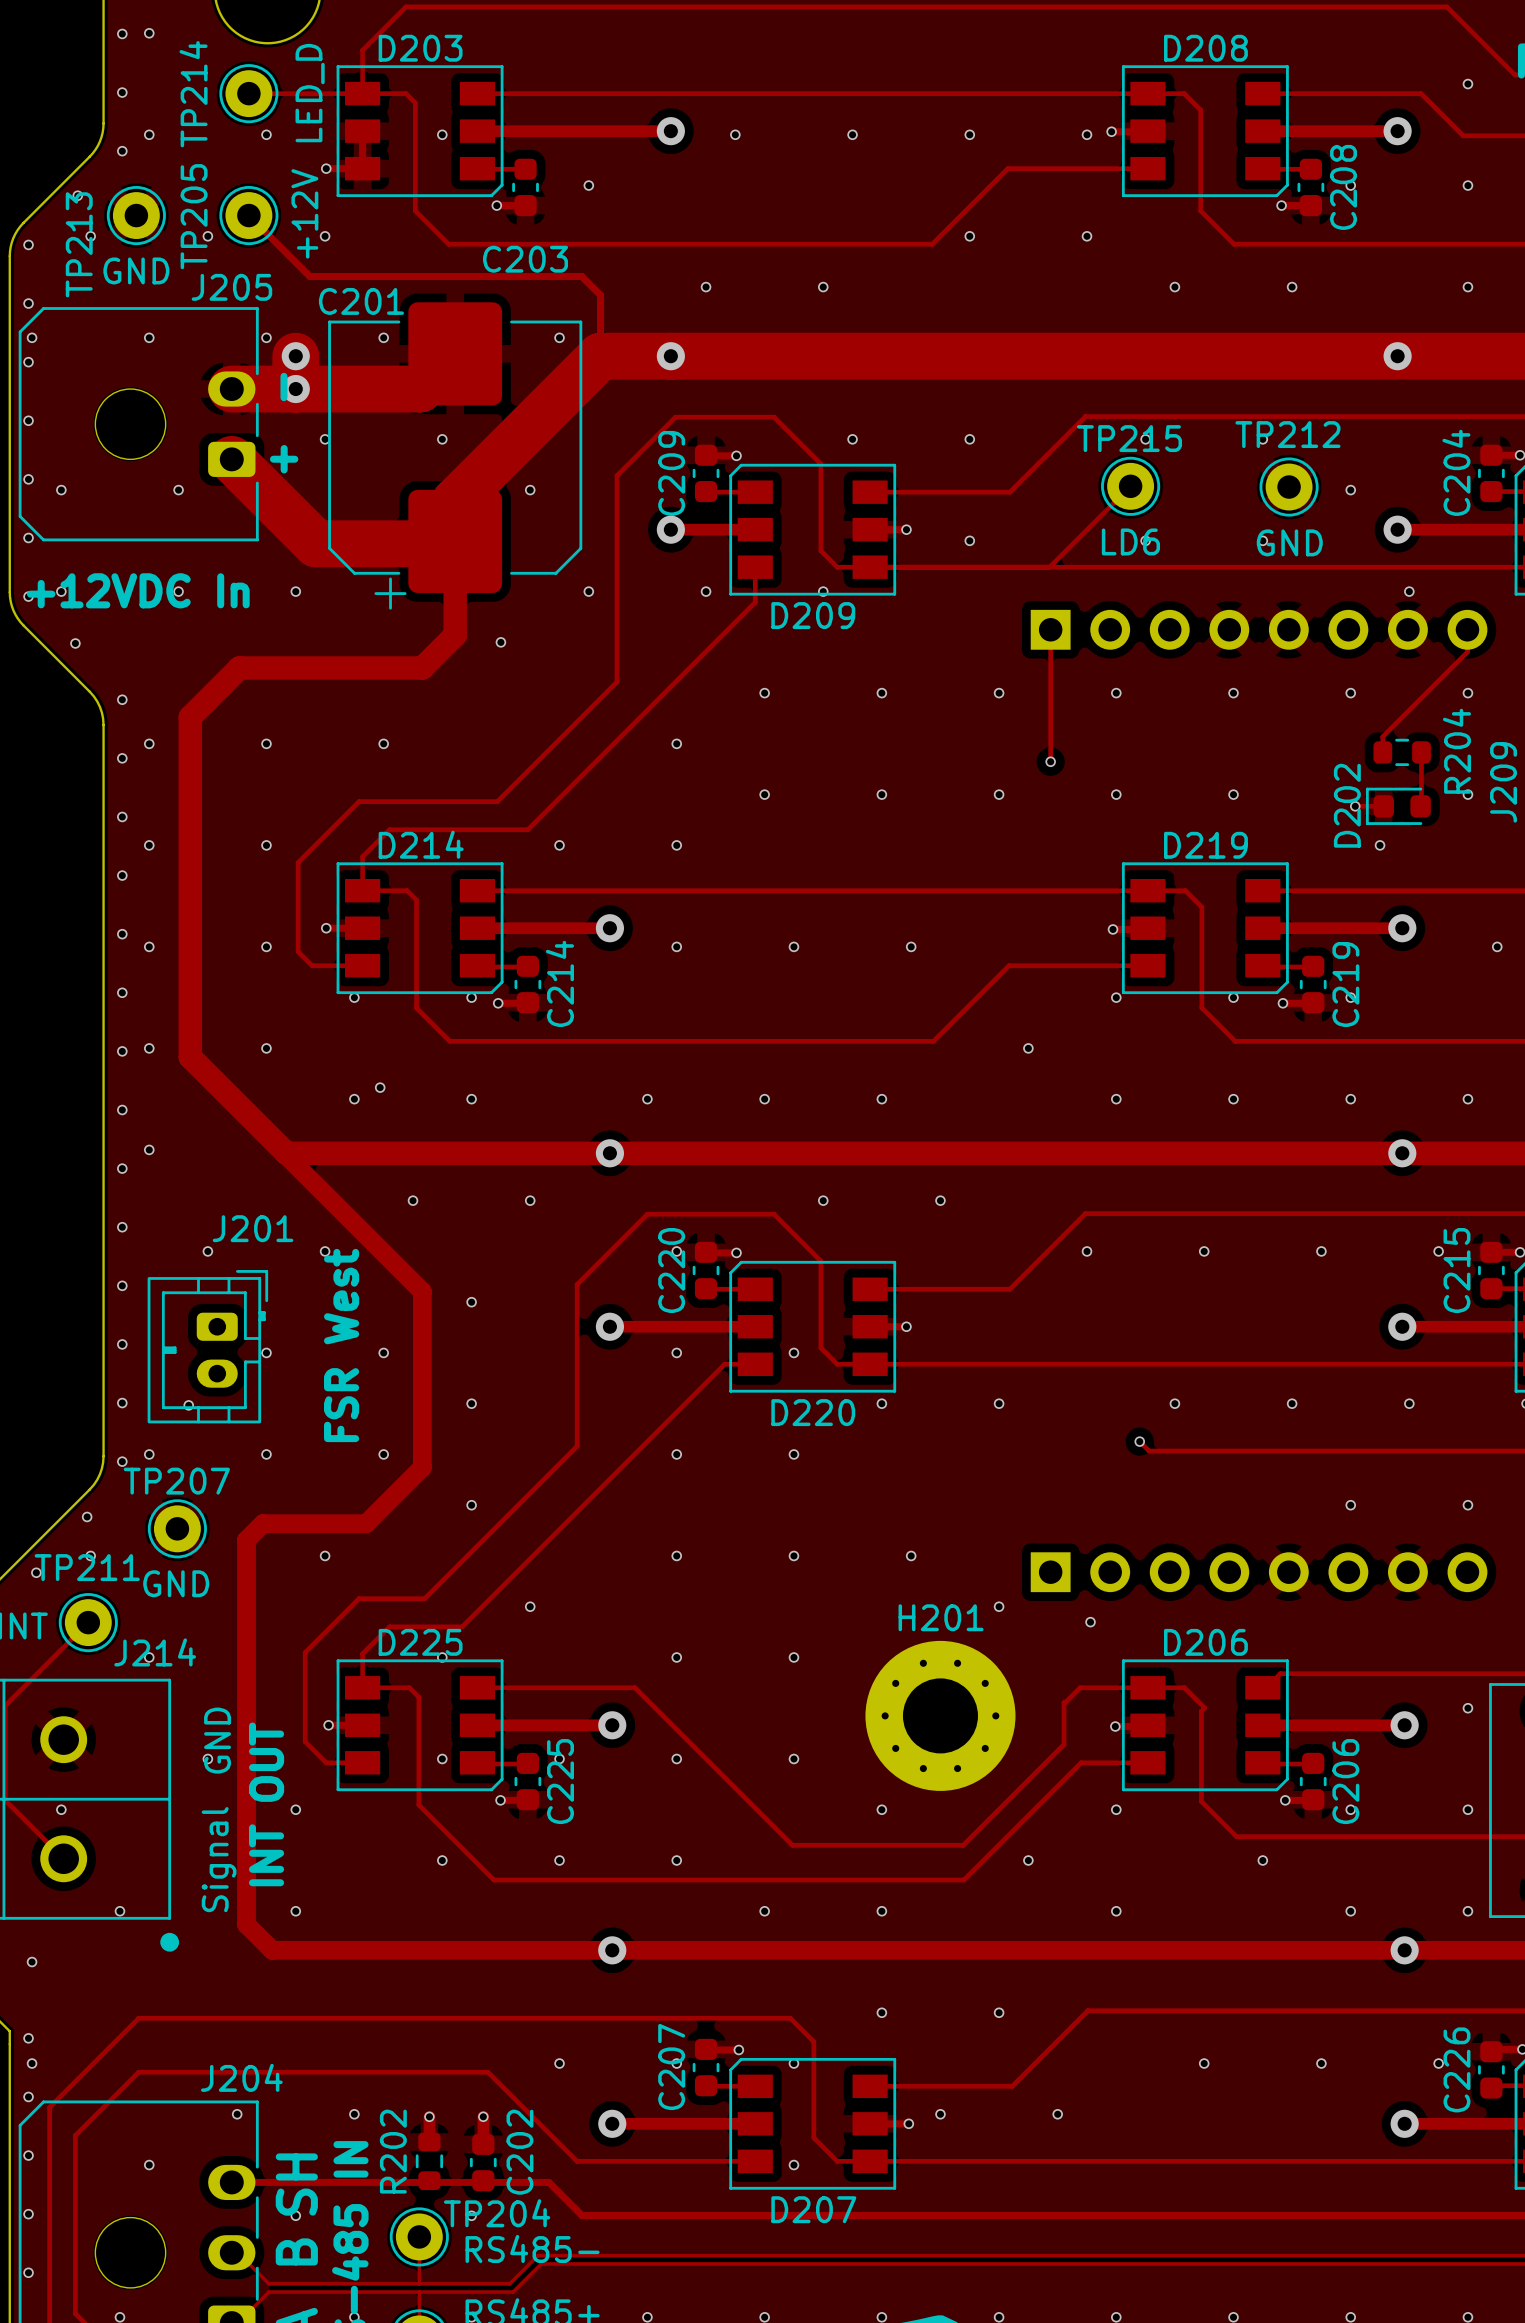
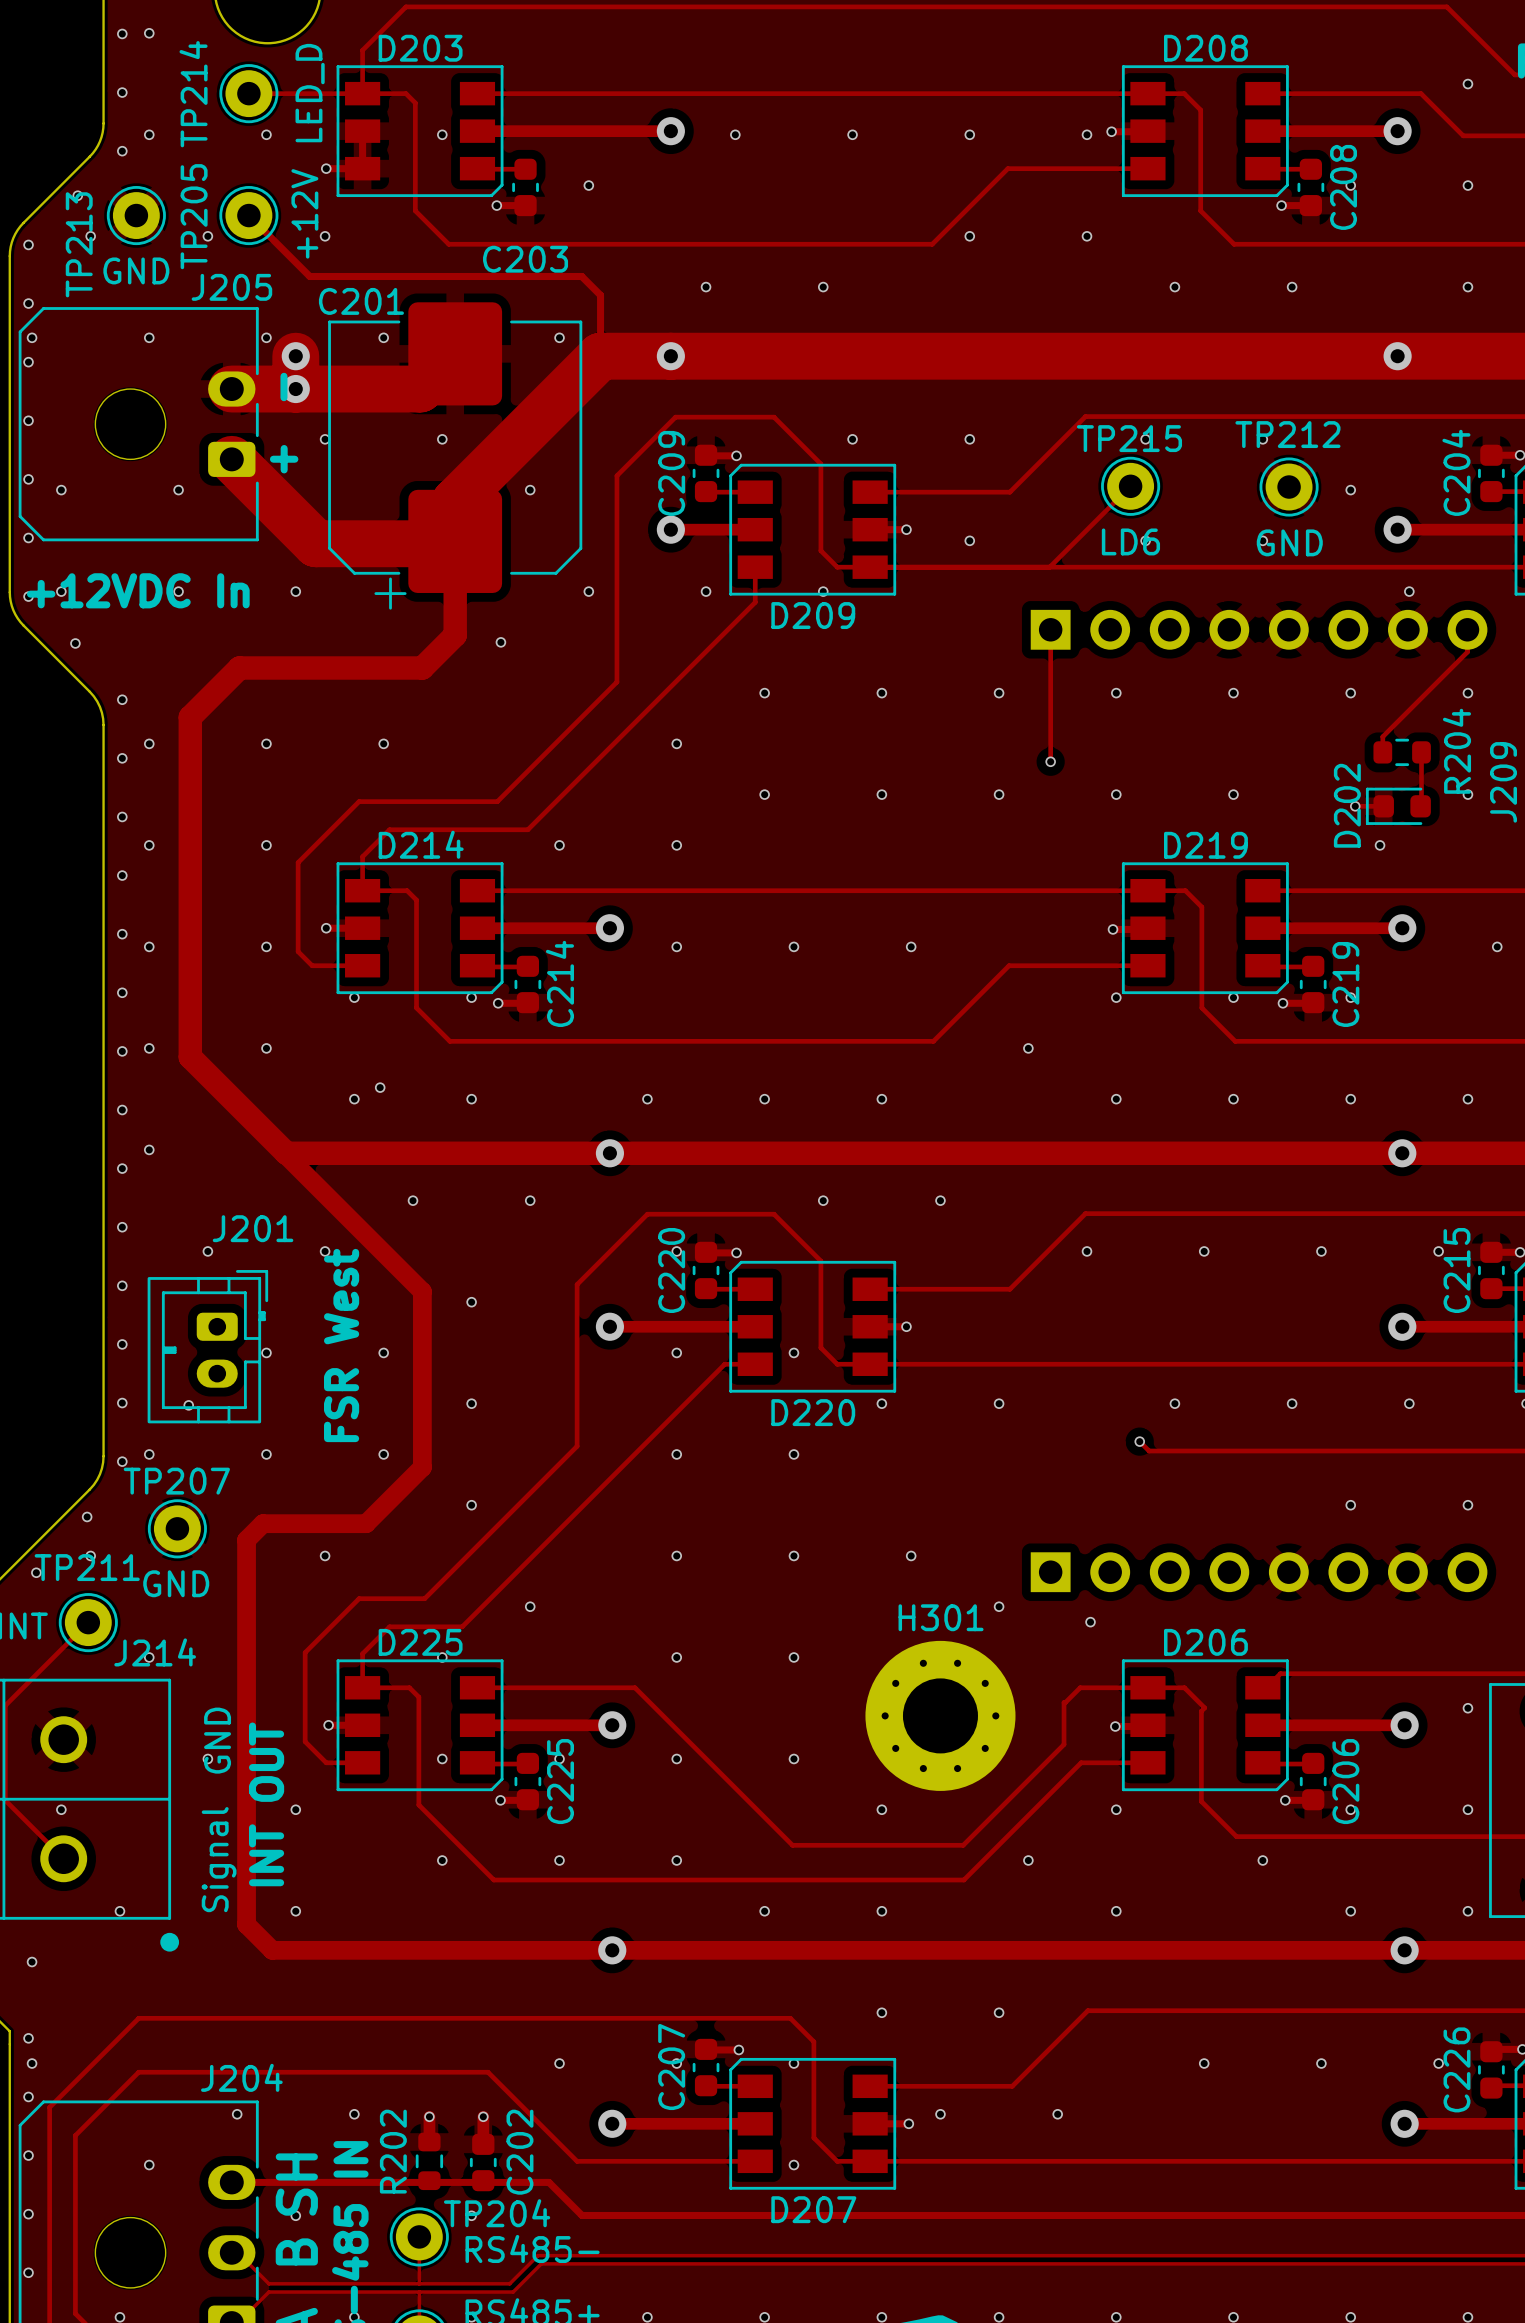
H201 name: H201 (941, 1617) -> H301 (941, 1617)

